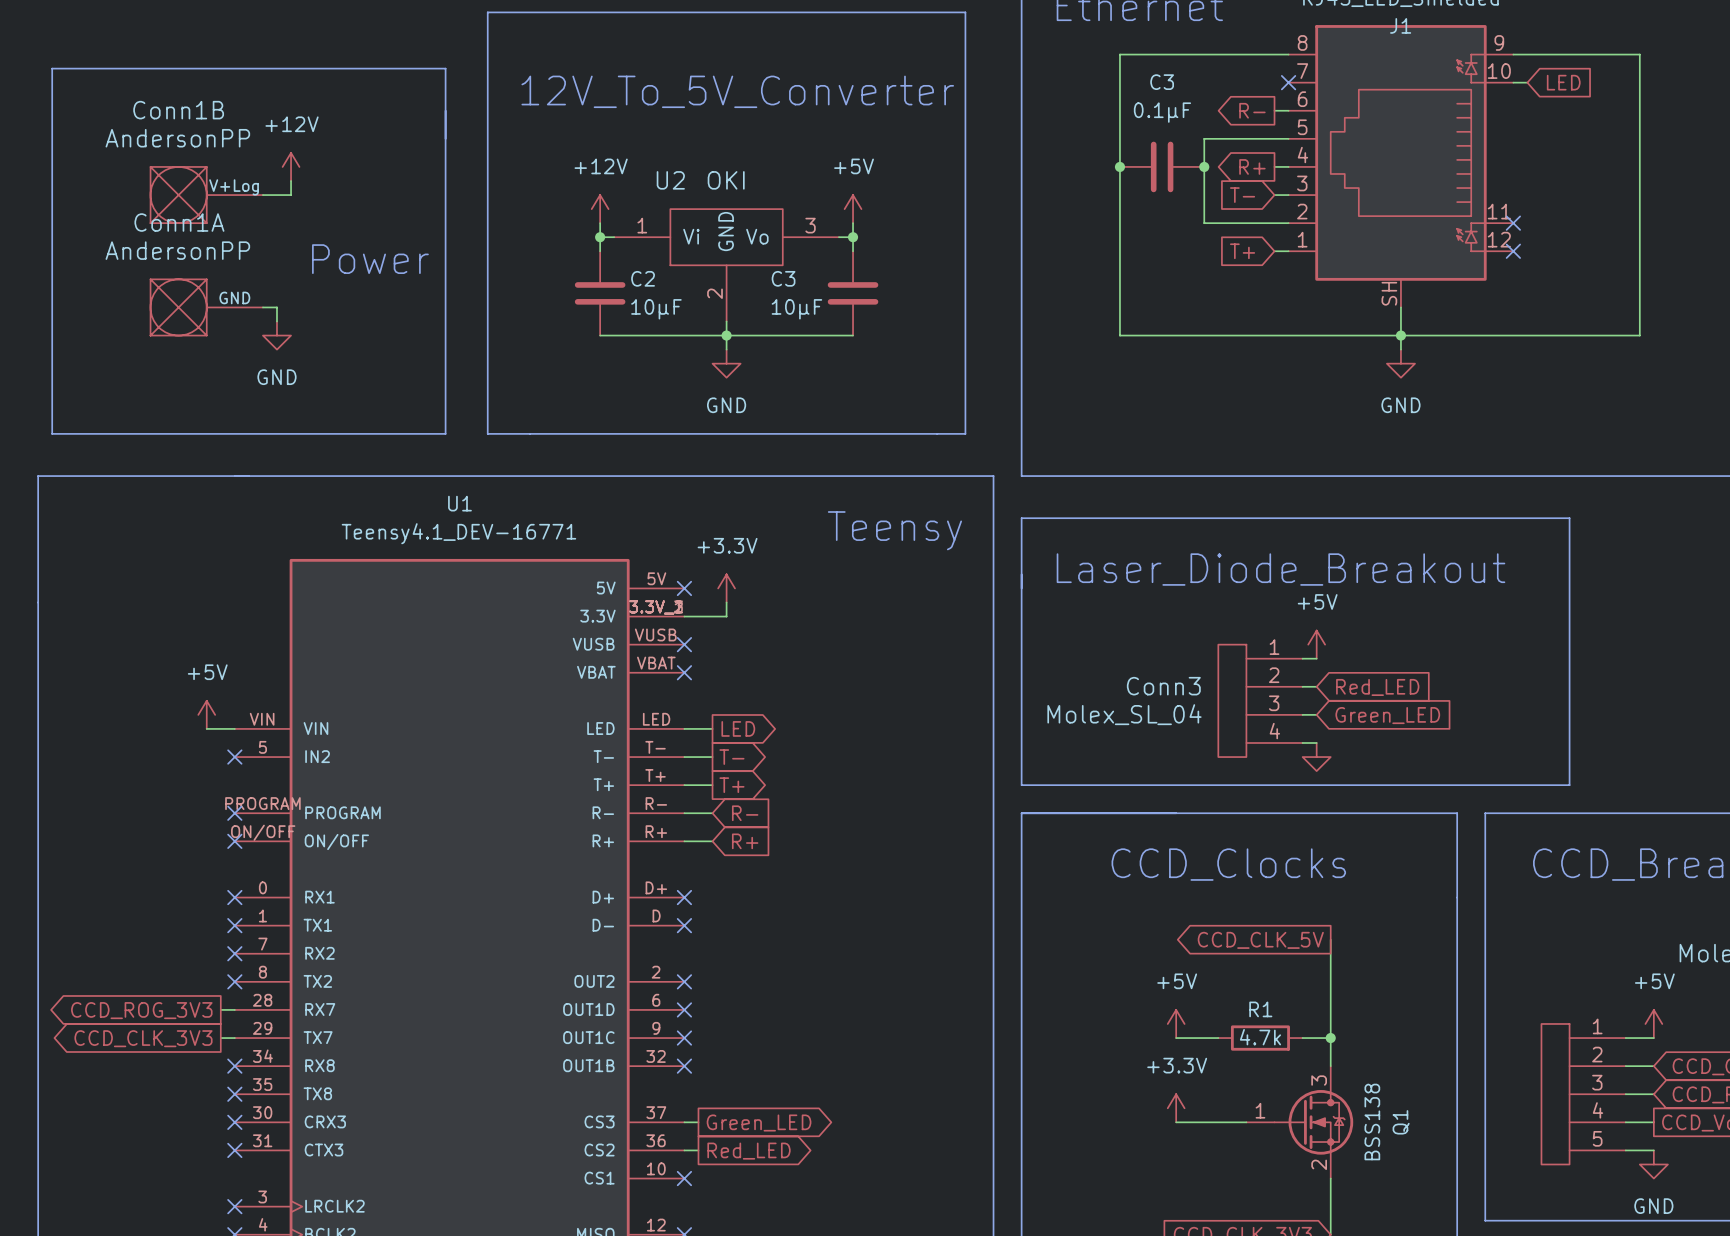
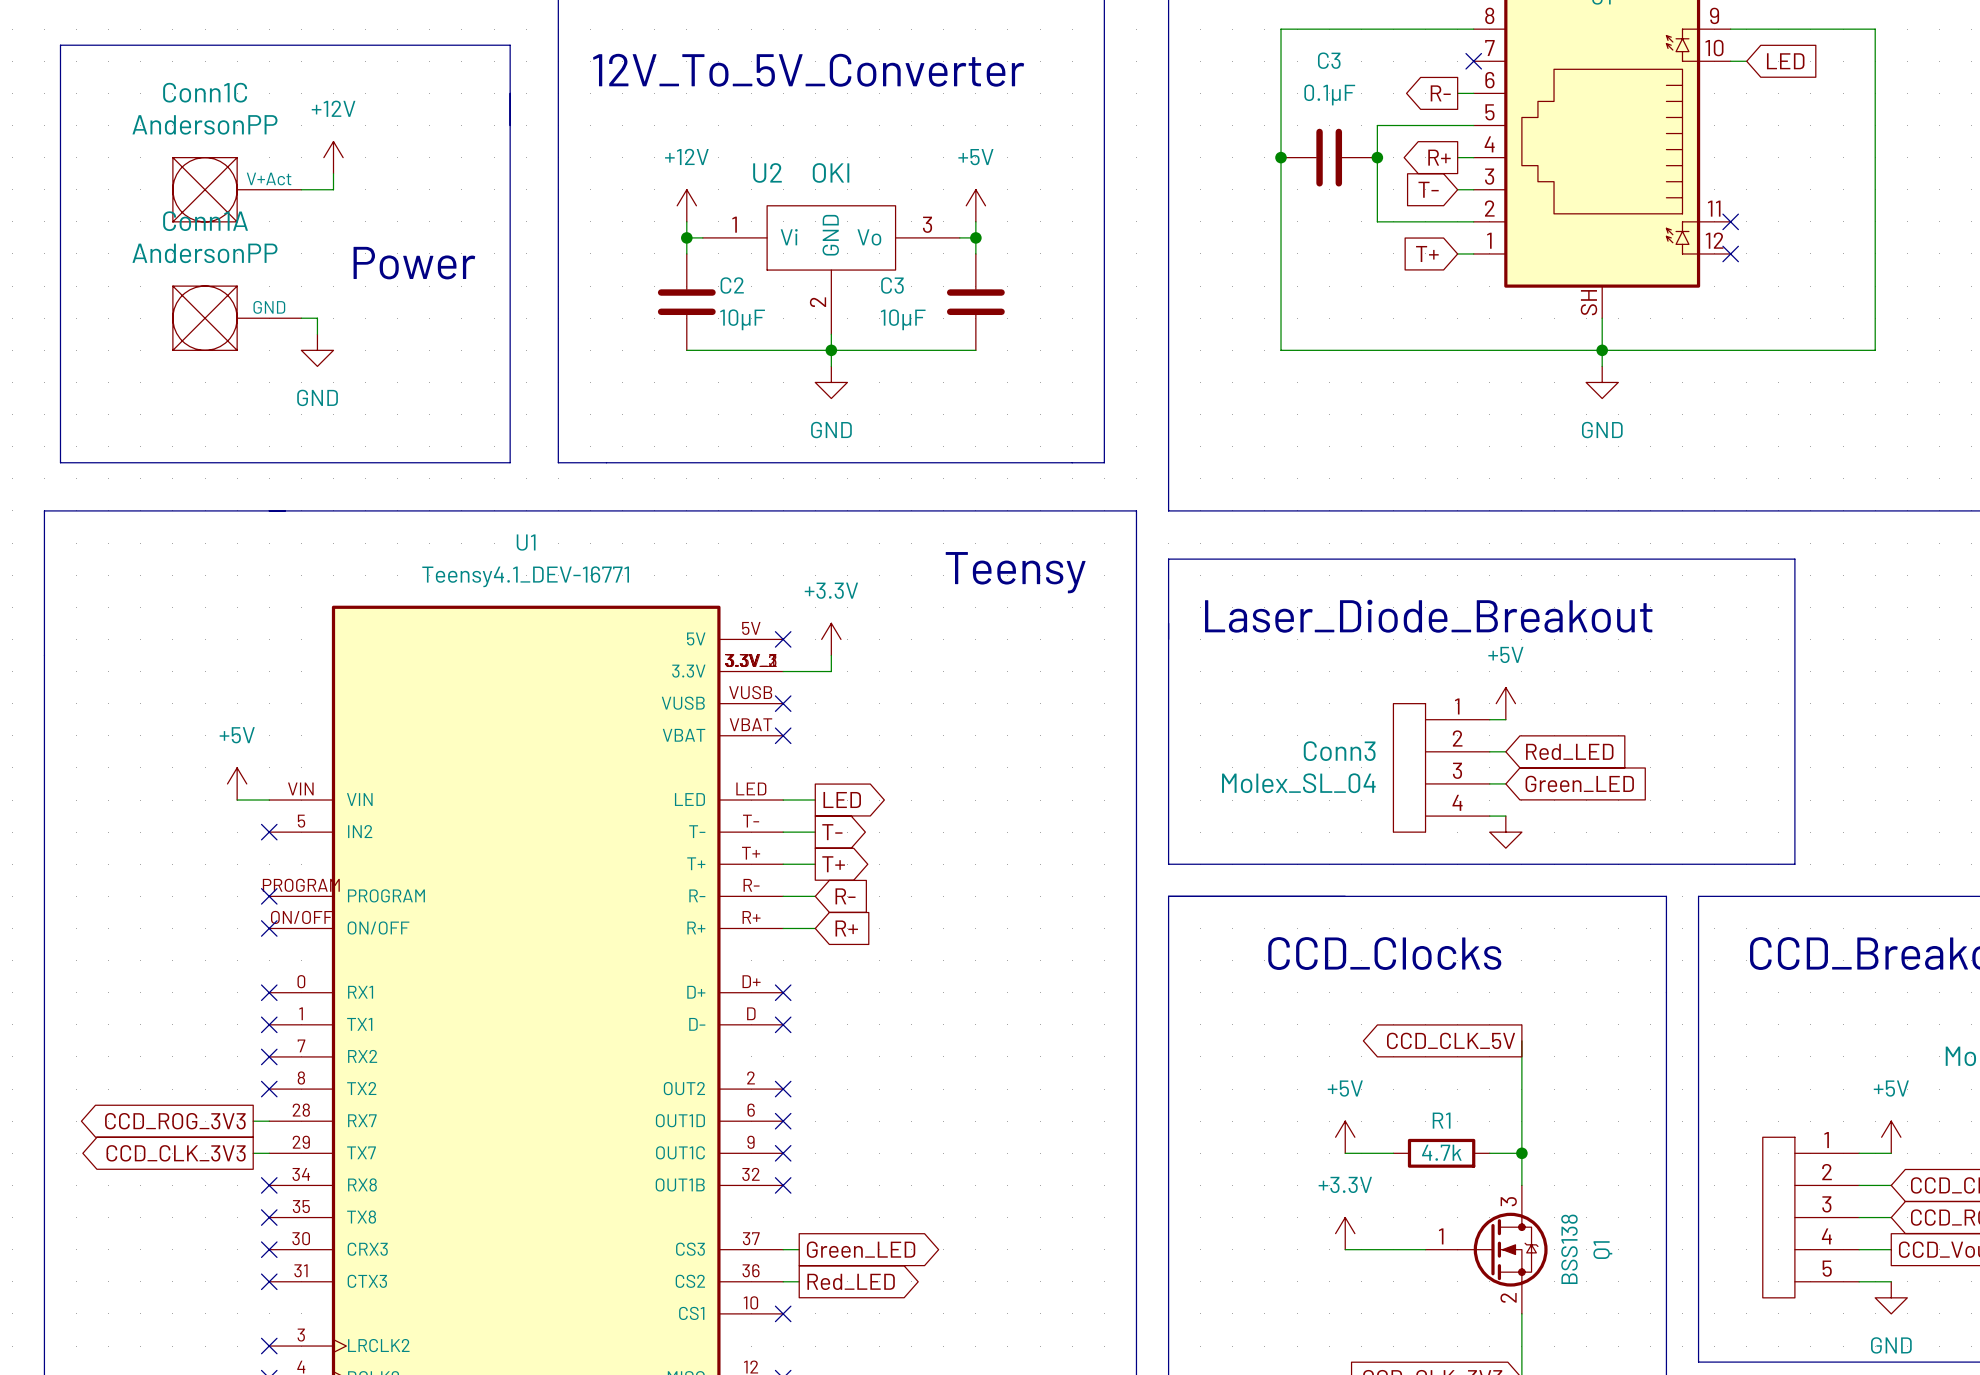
Conn1B name: Conn1B (178, 110) -> Conn1C (205, 92)
Conn1B pin name: V+Log (234, 187) -> V+Act (269, 178)

